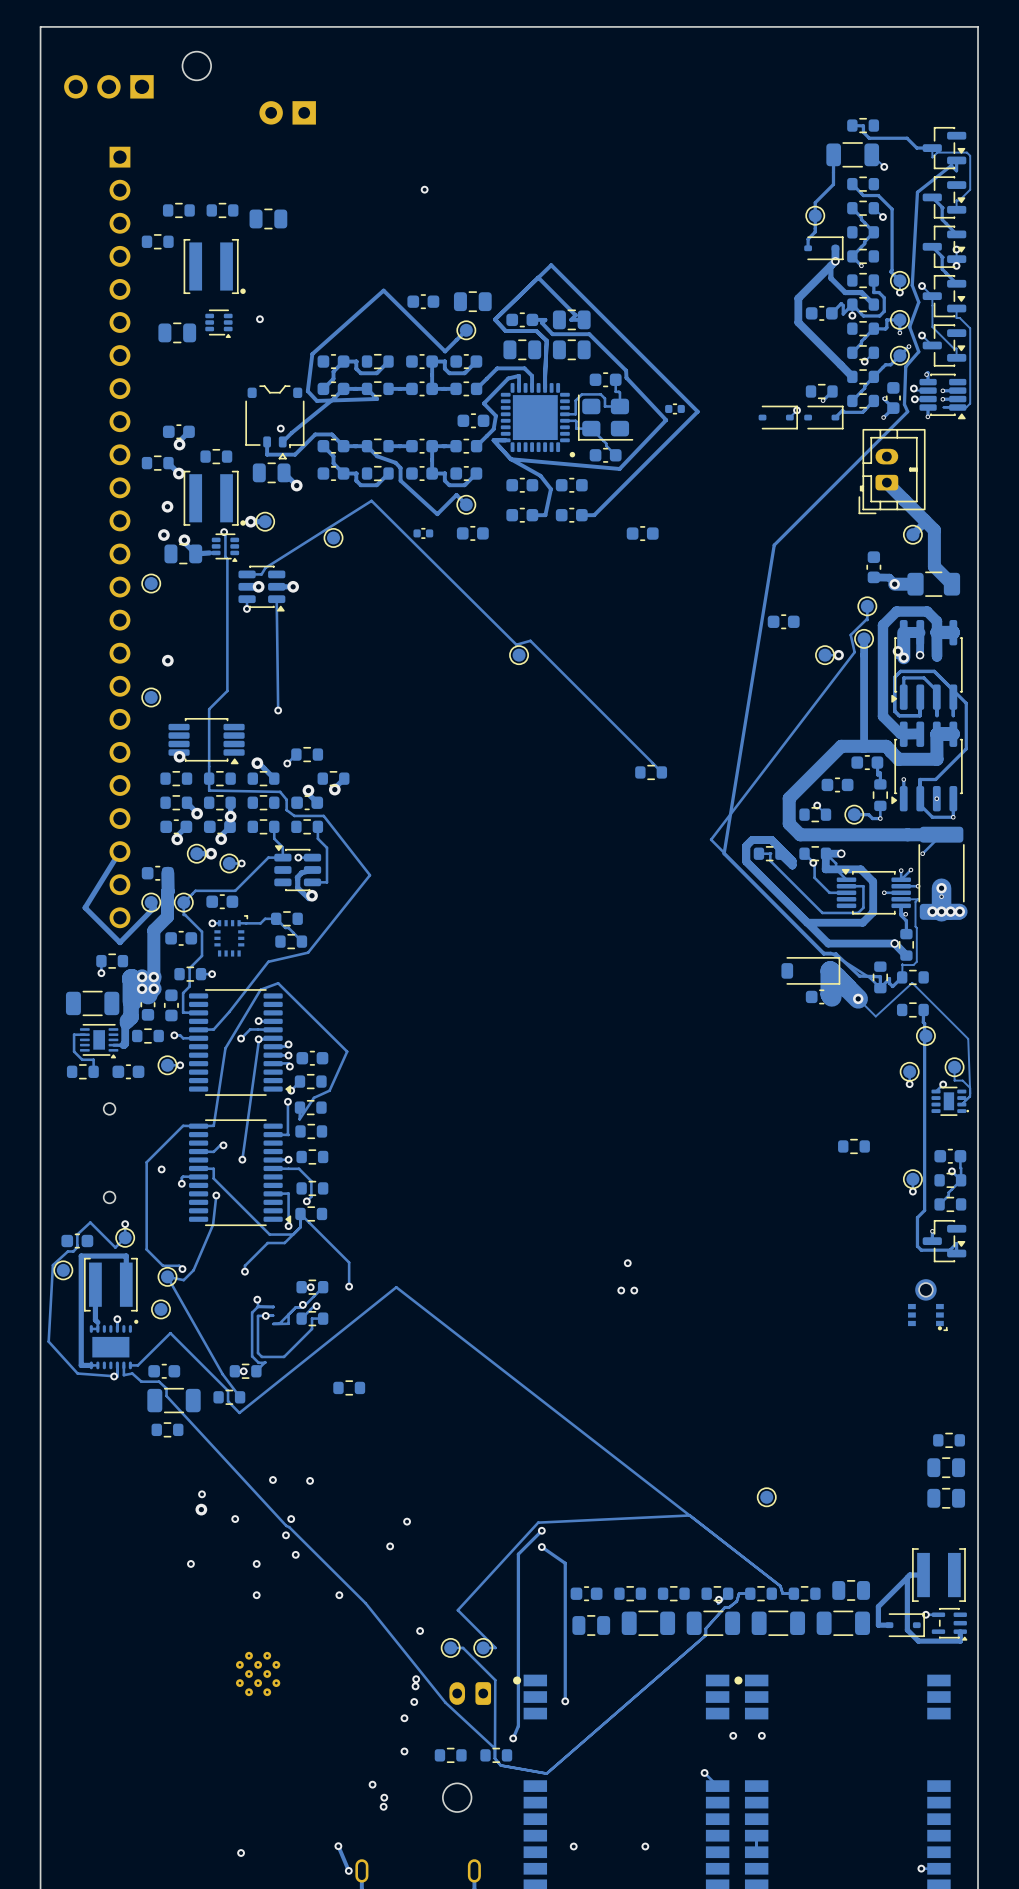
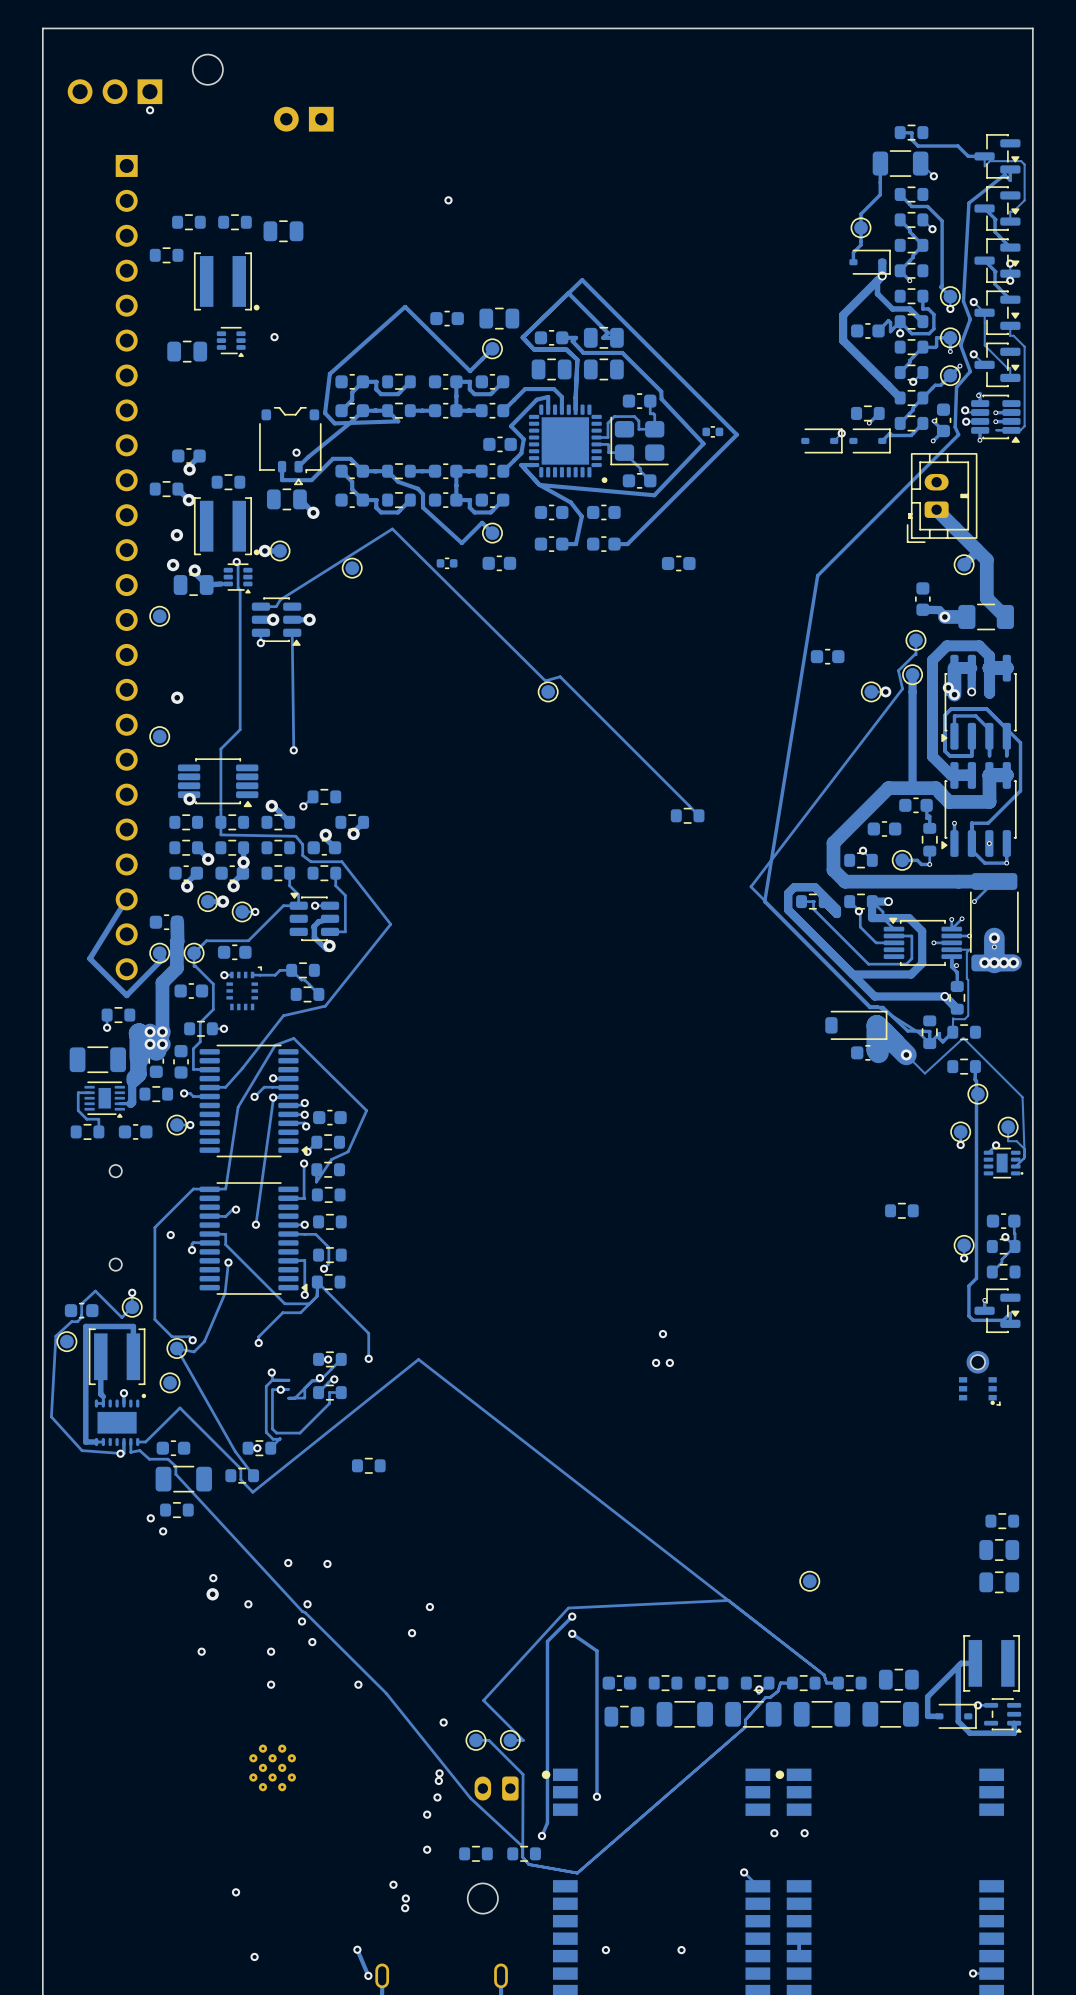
via: none -> (150, 110)
via: none -> (150, 1518)
via: none -> (163, 1531)
via: none -> (236, 1892)

